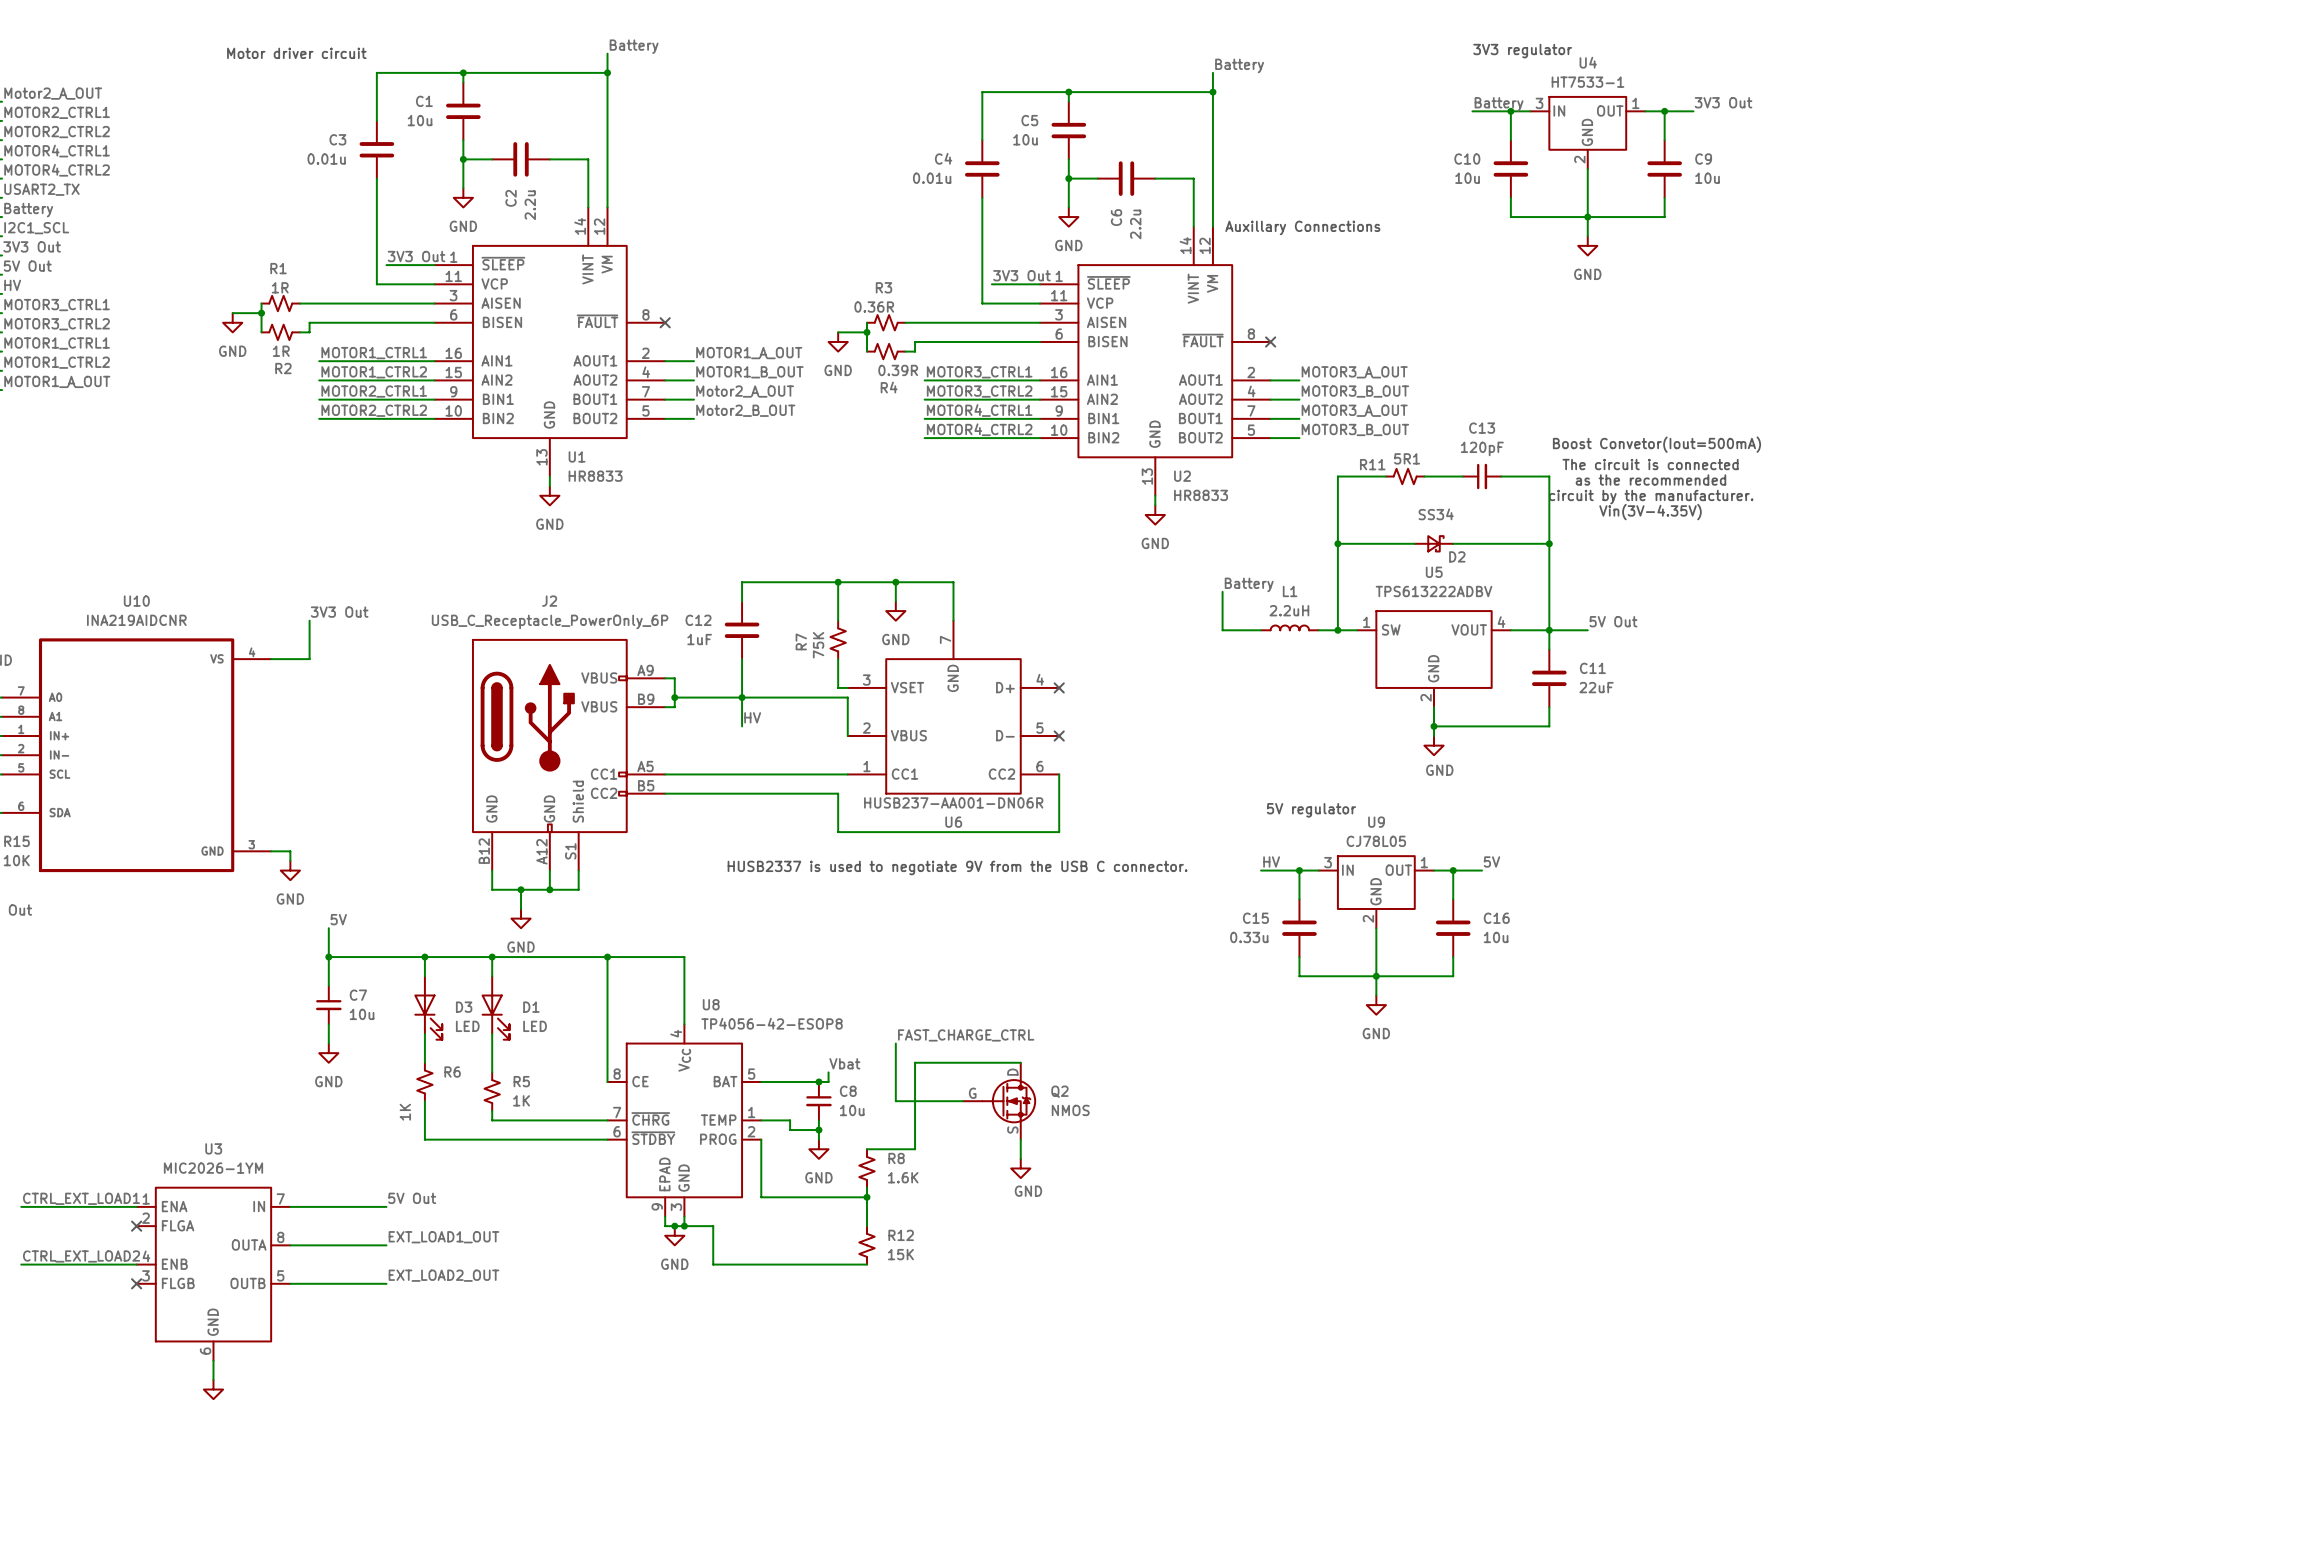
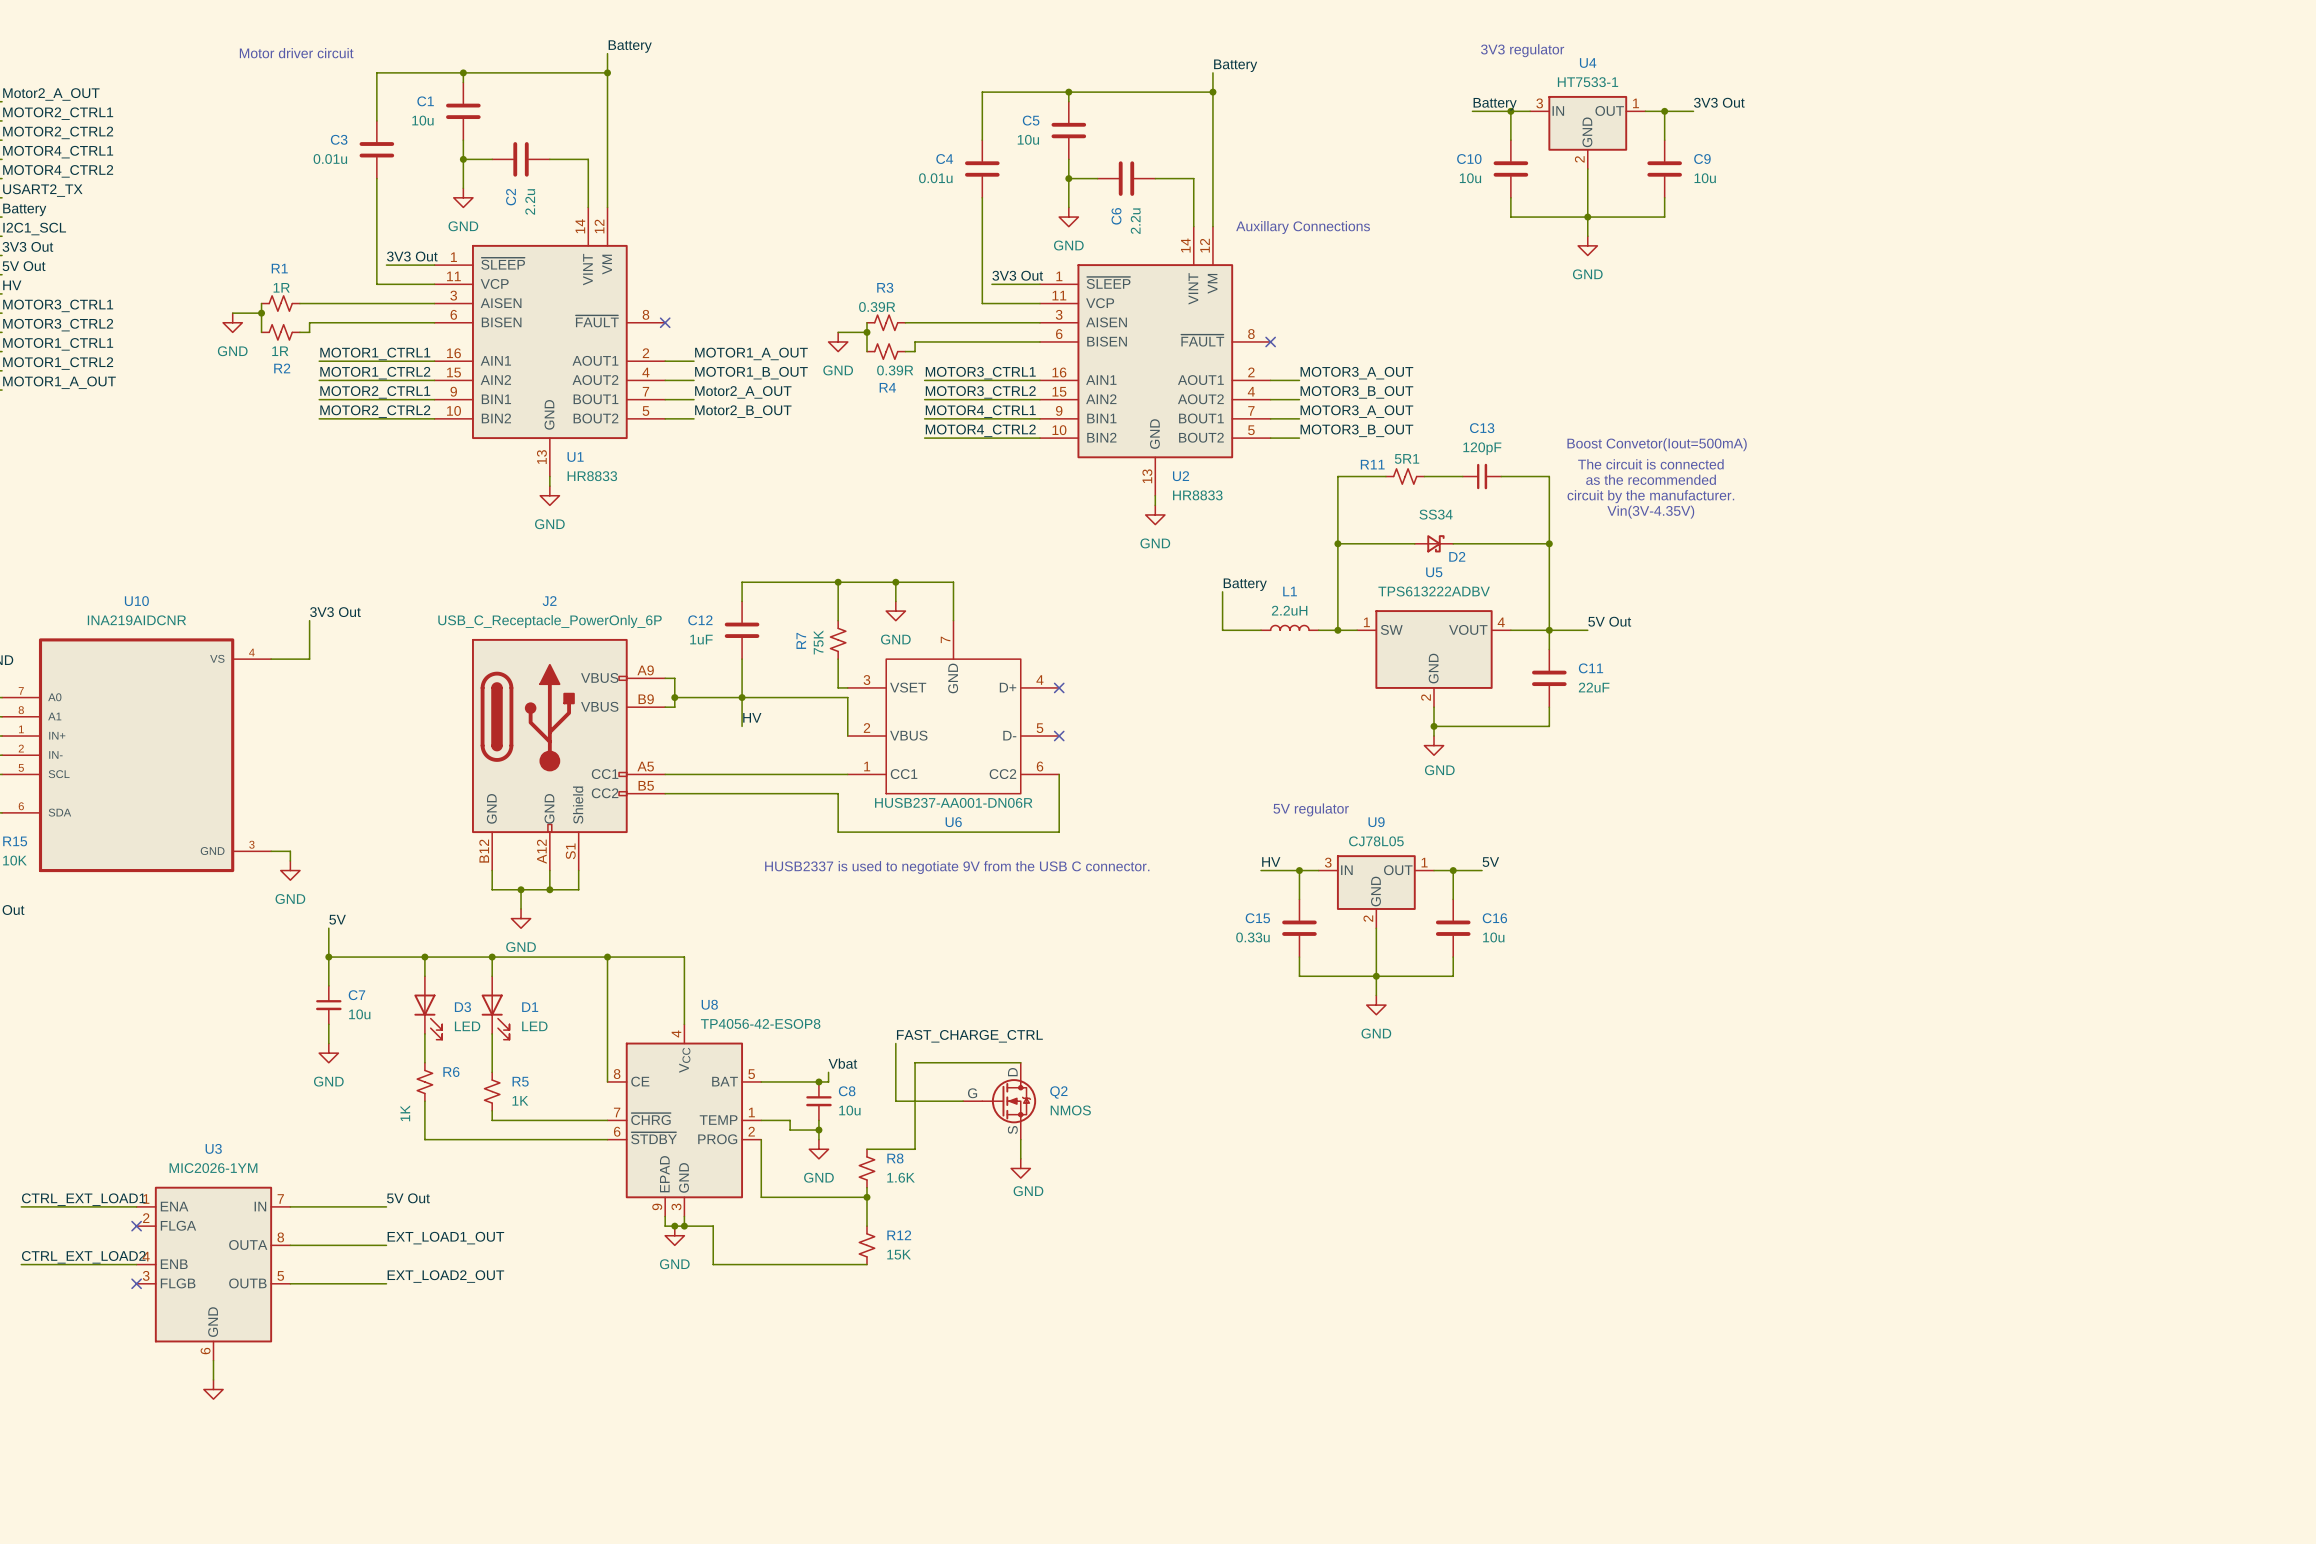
R3 value: 0.36R (874, 307) -> 0.39R (877, 307)

